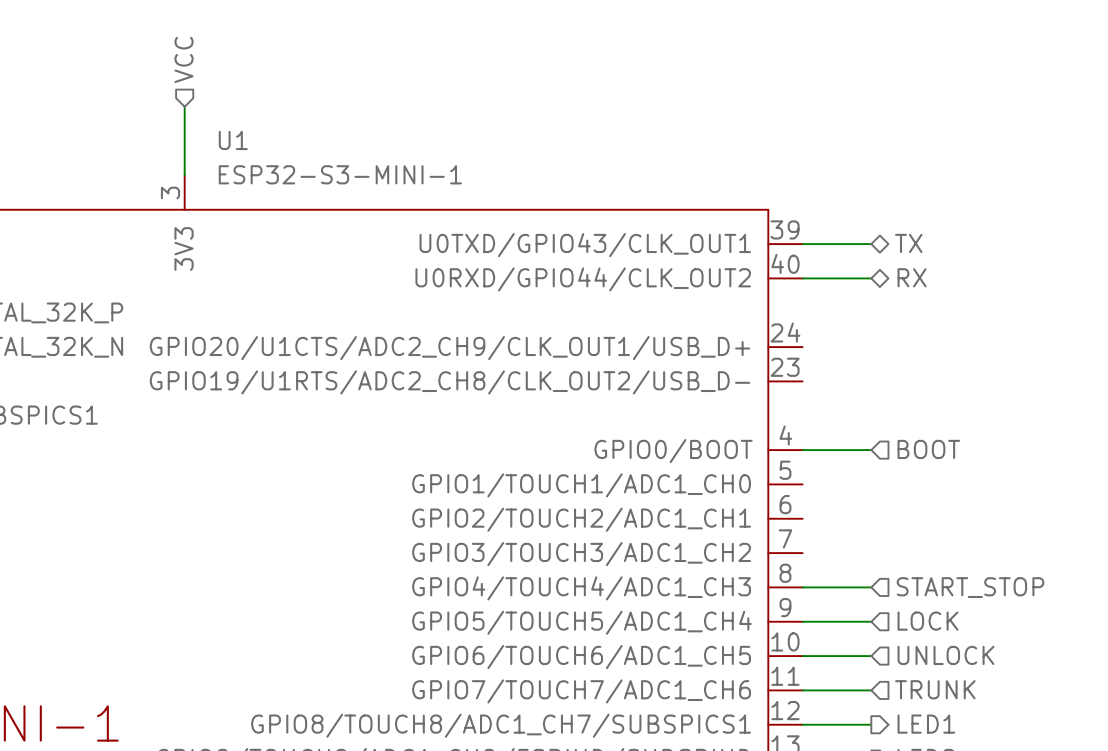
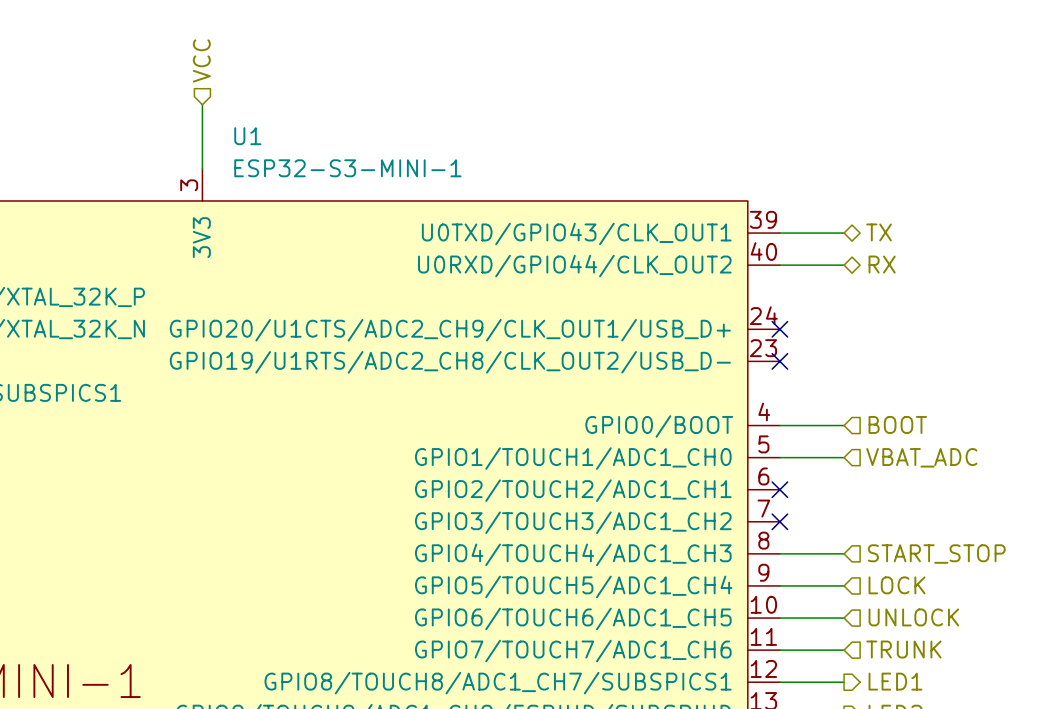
no-connect mark: none -> (779, 329)
no-connect mark: none -> (779, 361)
wire: none -> (779, 457) (844, 457)
hierarchical label: none -> VBAT_ADC (921, 457)
no-connect mark: none -> (779, 489)
no-connect mark: none -> (779, 521)

